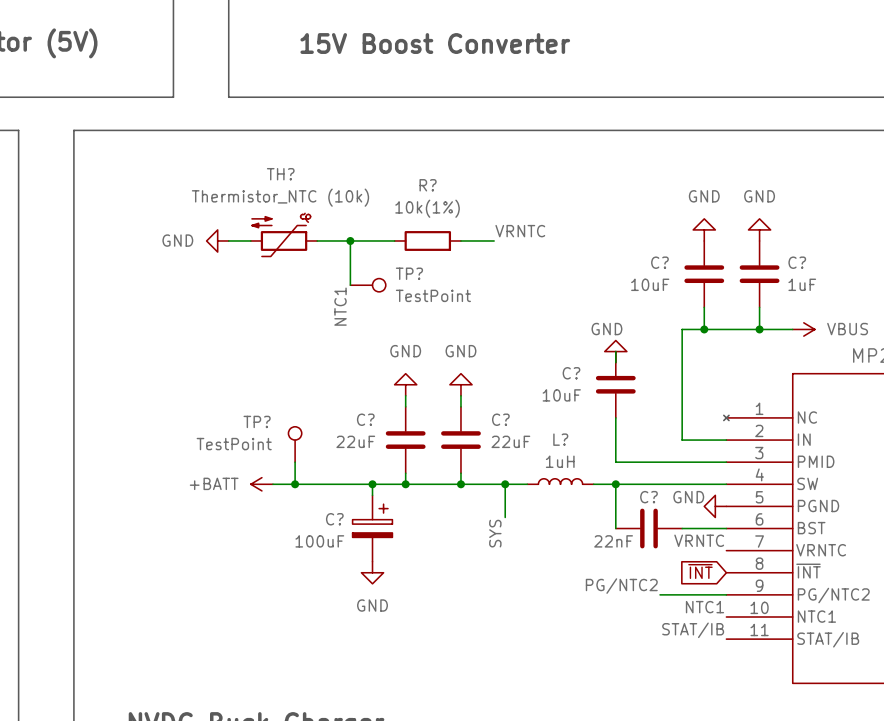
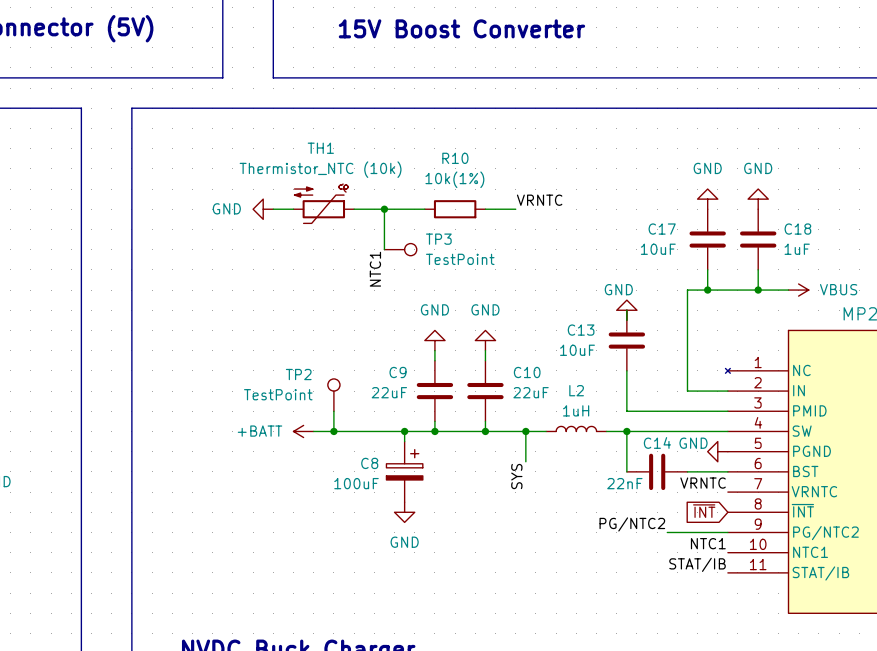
TH? name: TH? (280, 174) -> TH1 (320, 148)
R? name: R? (428, 185) -> R10 (455, 158)
C? name: C? (659, 262) -> C17 (662, 229)
C? name: C? (797, 262) -> C18 (797, 229)
TP? name: TP? (409, 273) -> TP3 (438, 239)
C? name: C? (571, 373) -> C13 (581, 330)
C? name: C? (365, 419) -> C9 (398, 372)
C? name: C? (500, 419) -> C10 (527, 372)
TP? name: TP? (257, 421) -> TP2 (298, 374)
L? name: L? (560, 439) -> L2 (576, 390)
C? name: C? (648, 497) -> C14 (657, 442)
C? name: C? (334, 519) -> C8 (369, 463)

